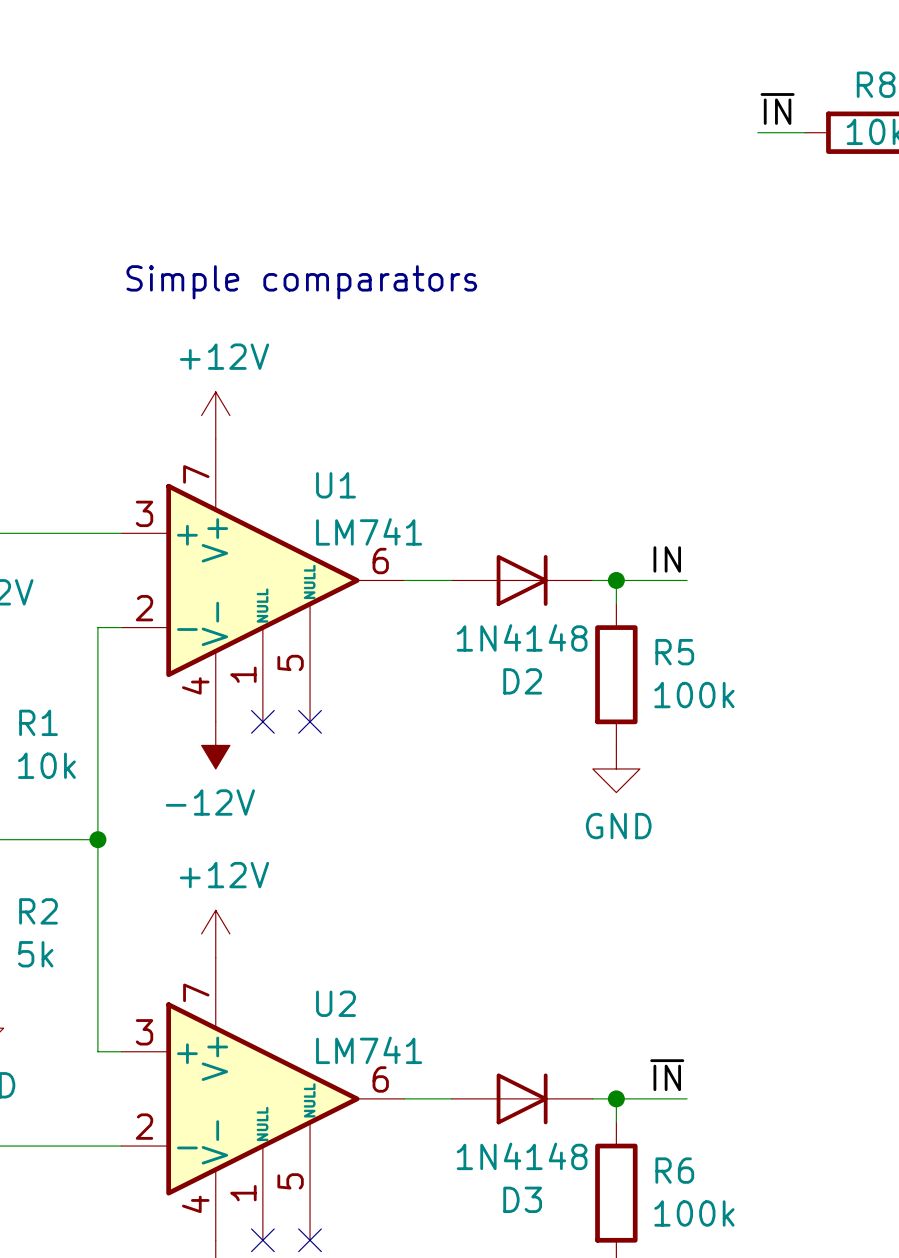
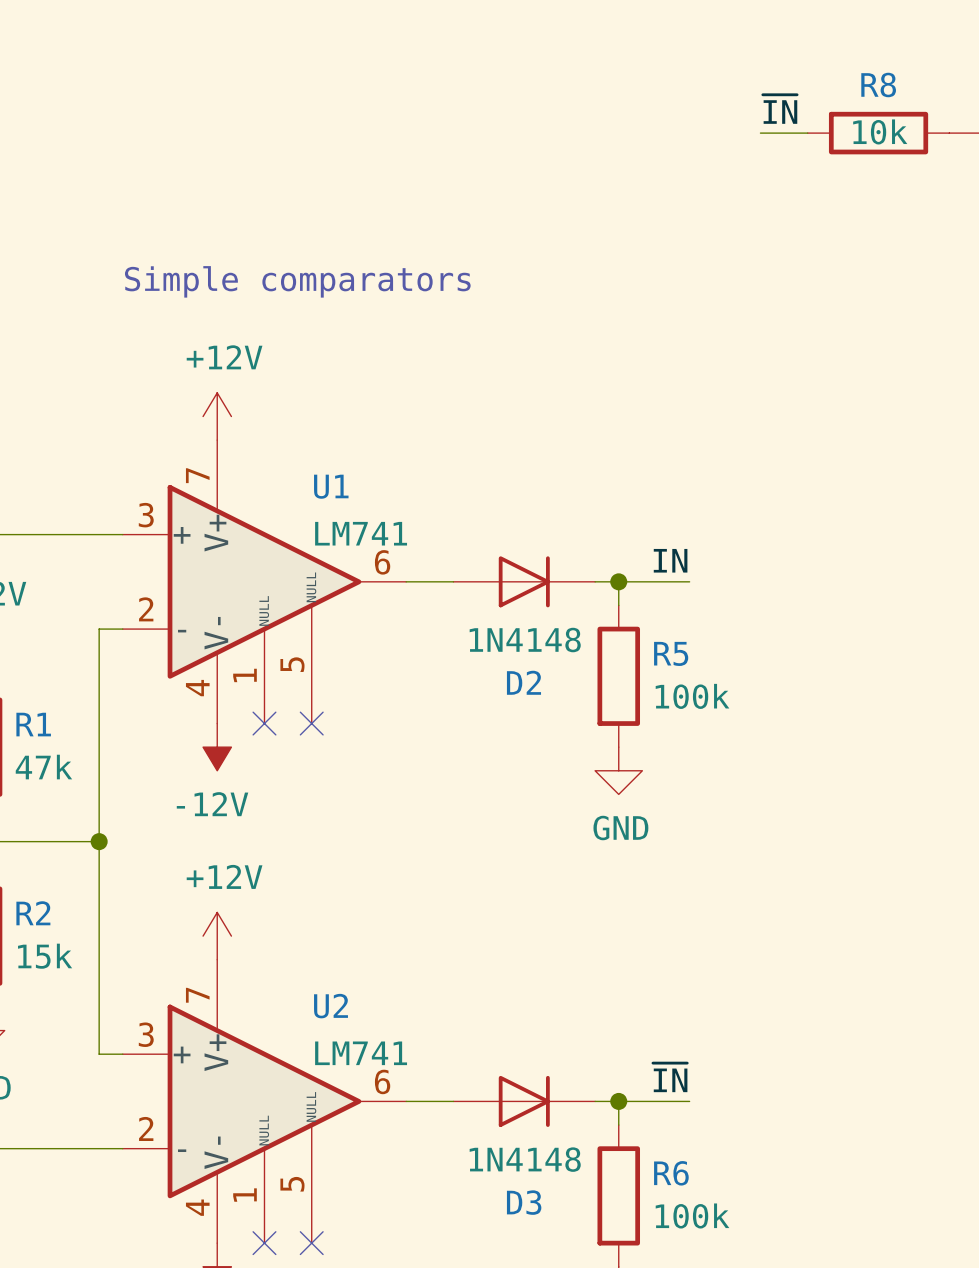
R1 value: 10k (46, 765) -> 47k (43, 767)
R2 value: 5k (35, 954) -> 15k (45, 956)

